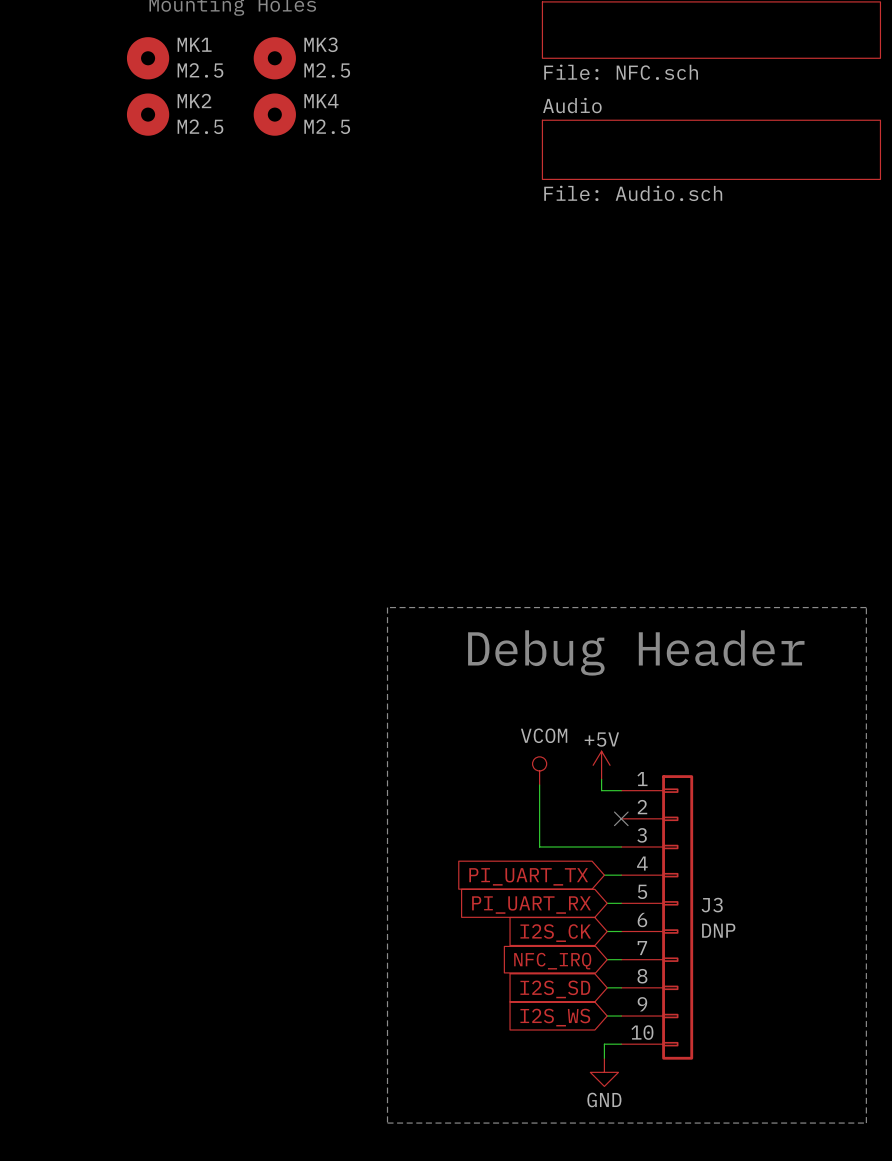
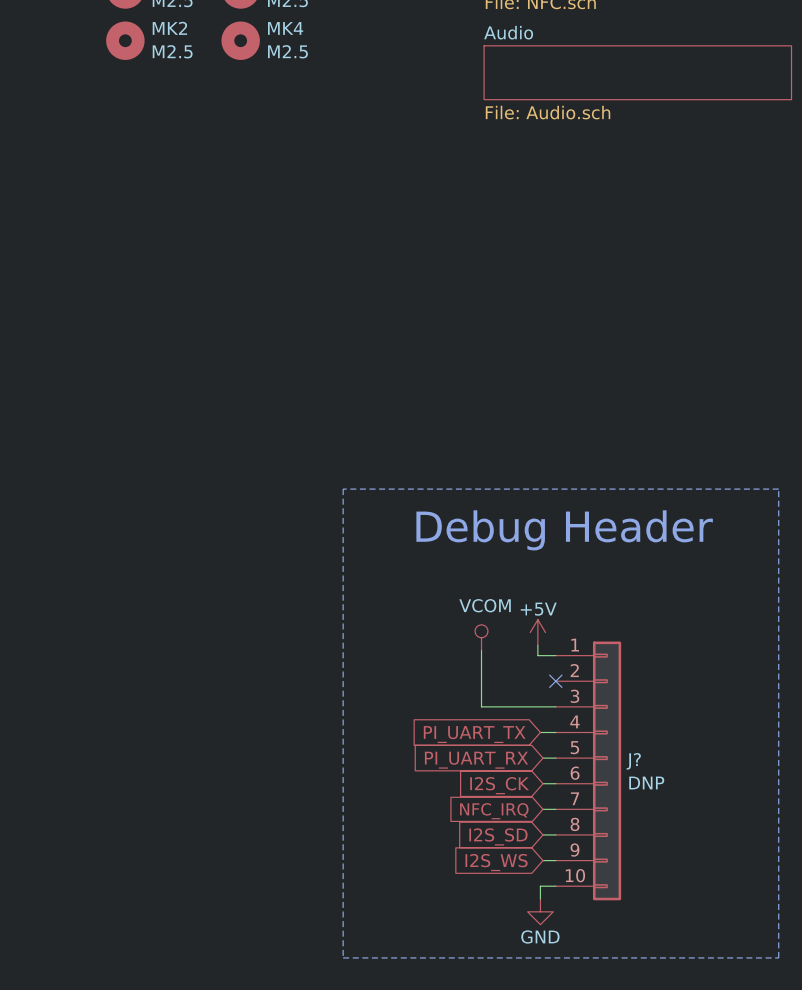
J3 name: J3 (712, 905) -> J? (633, 761)

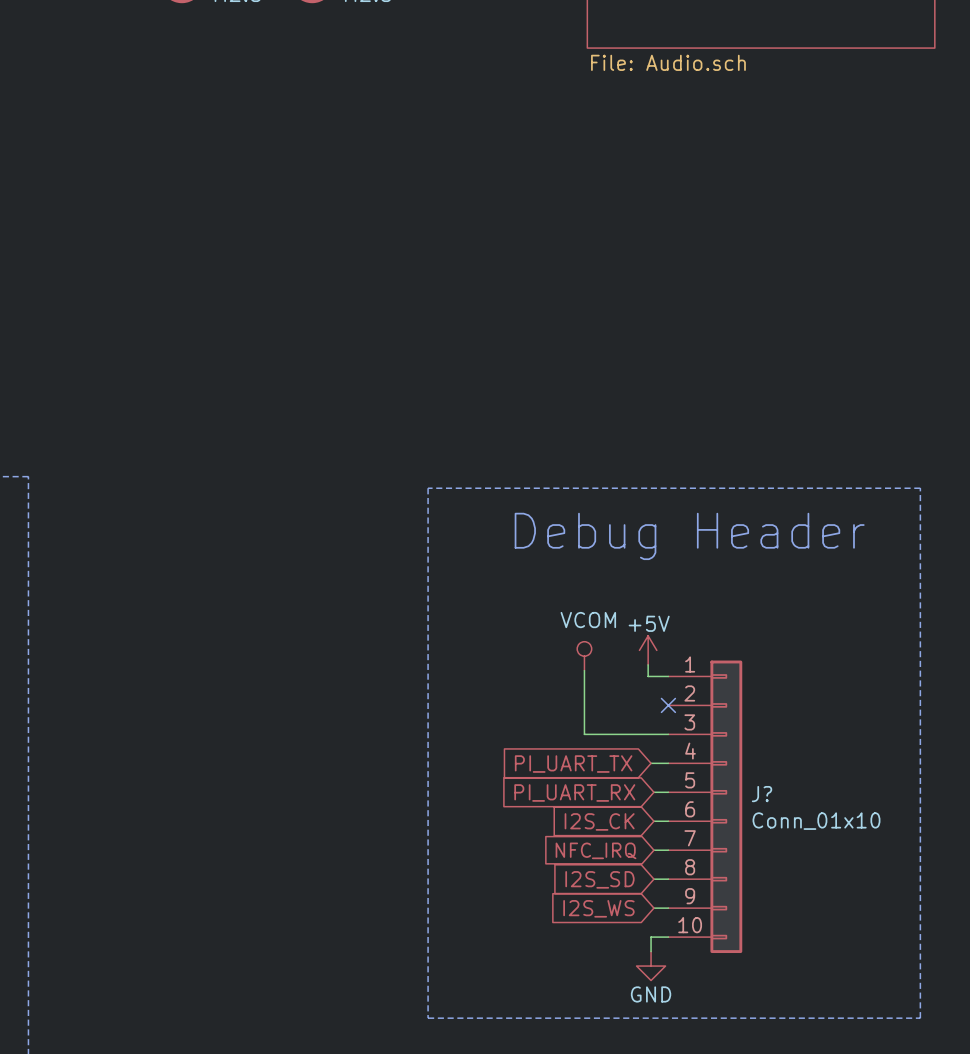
J? value: DNP (646, 782) -> Conn_01x10 (816, 821)

